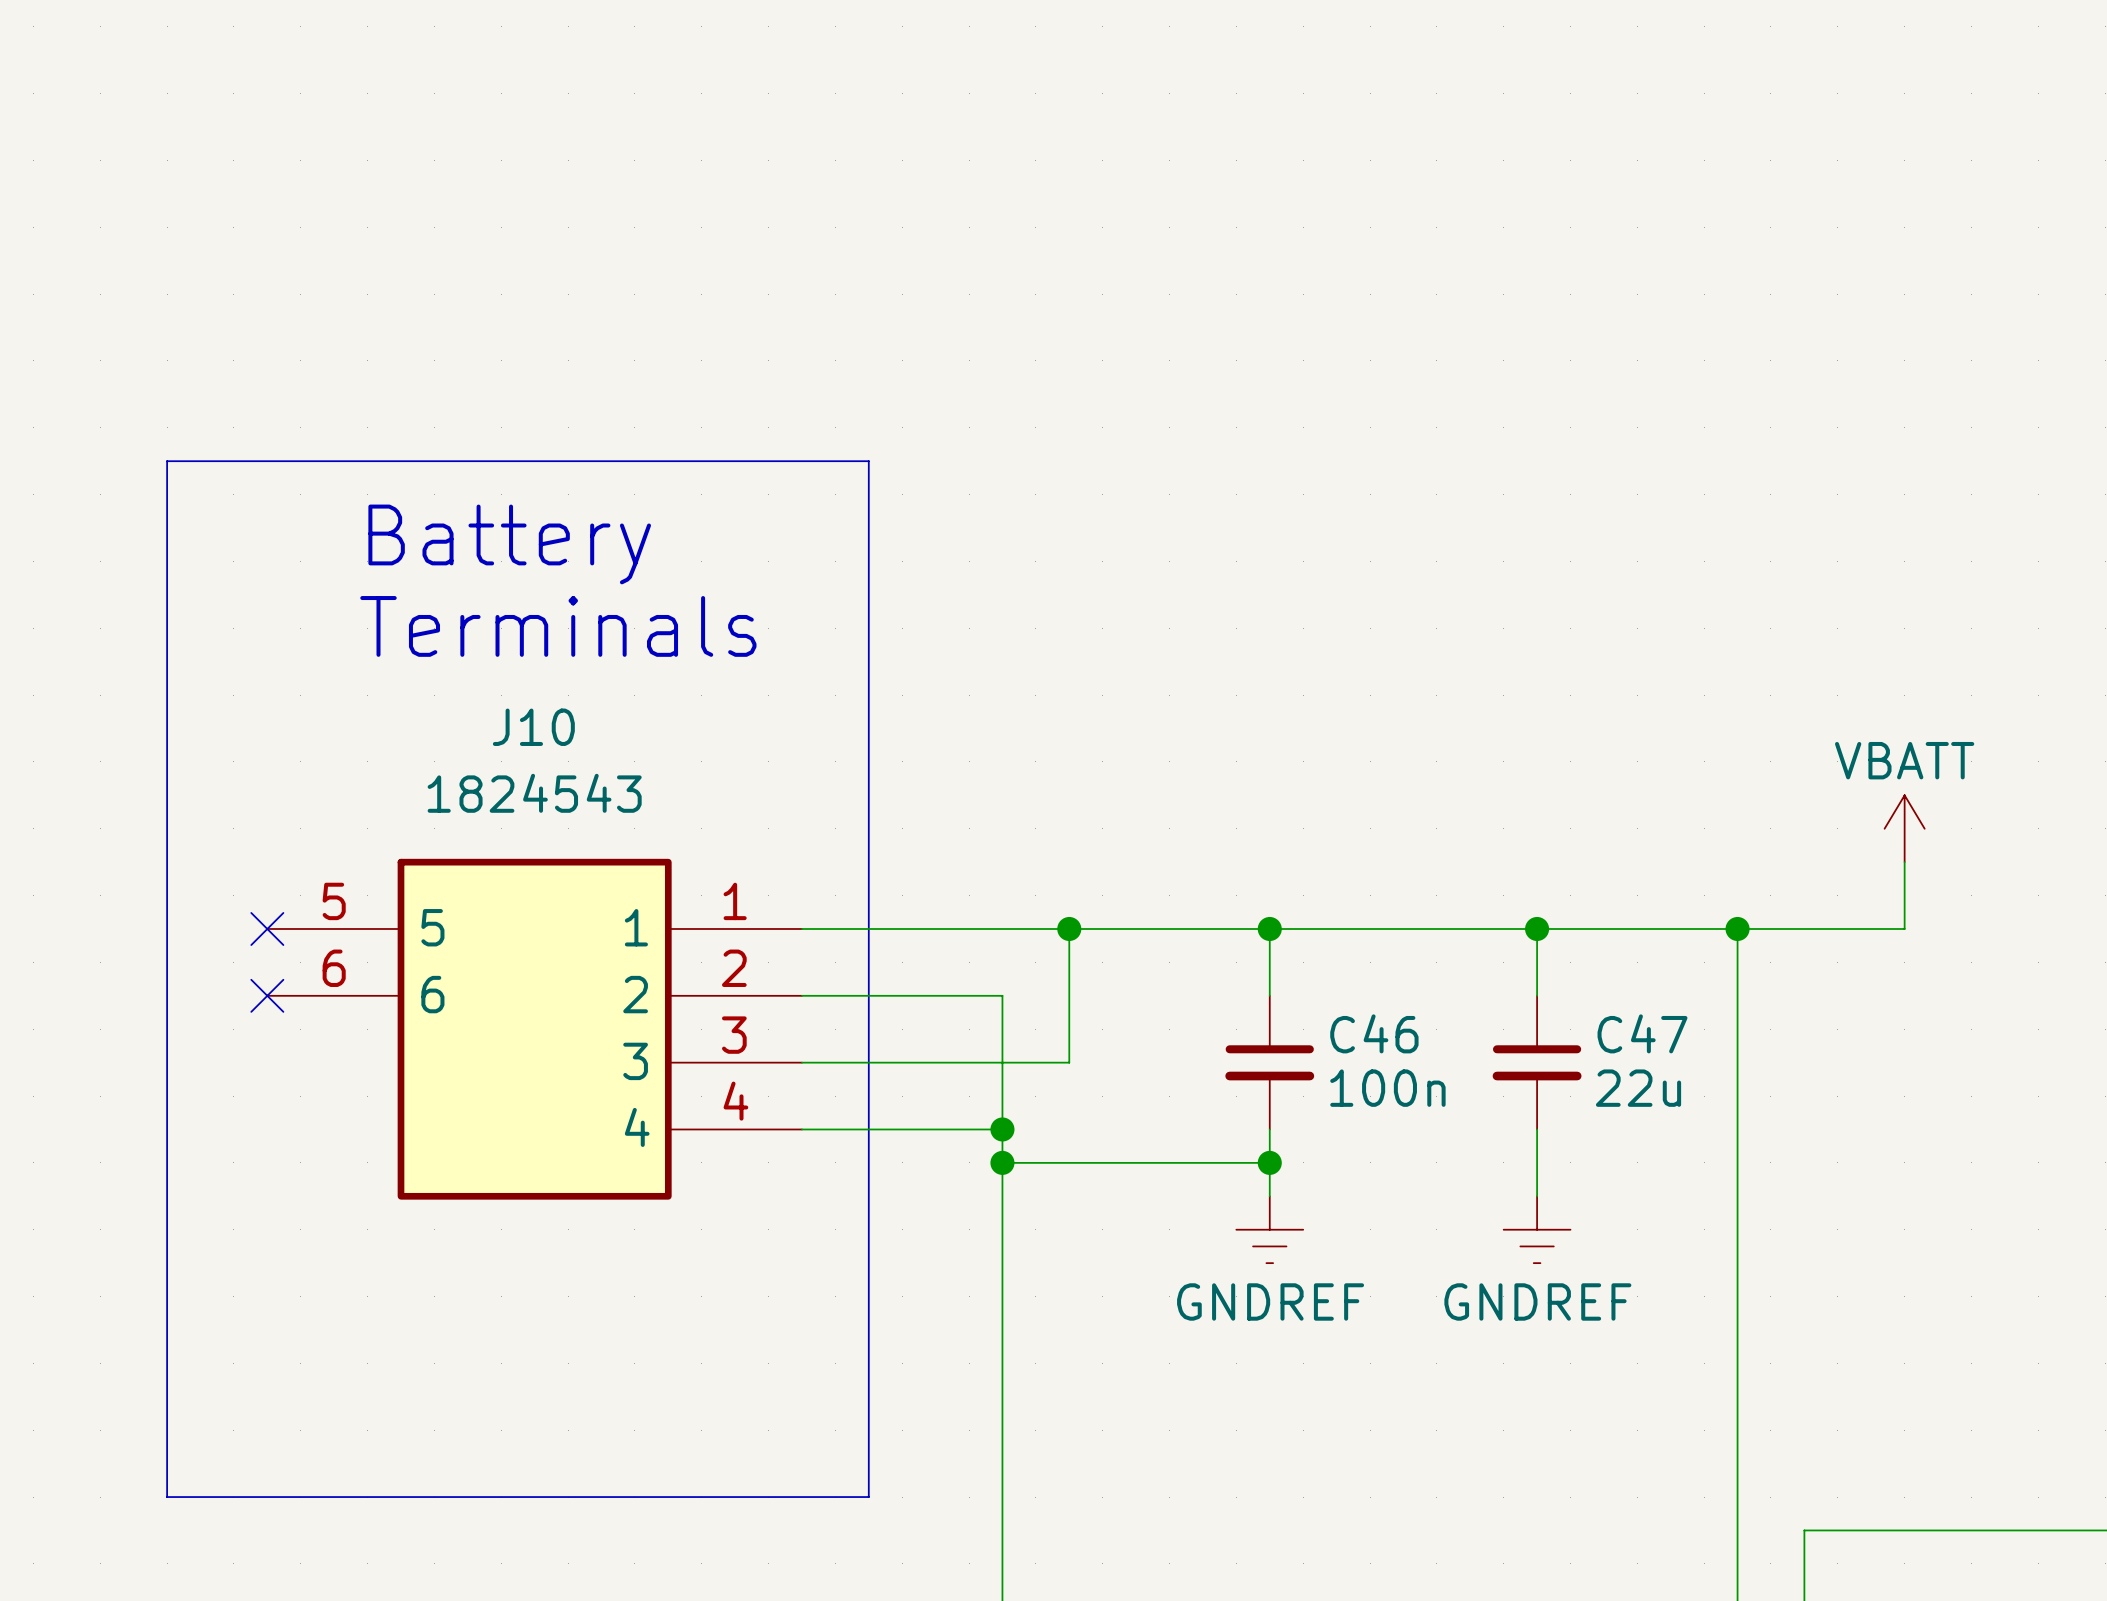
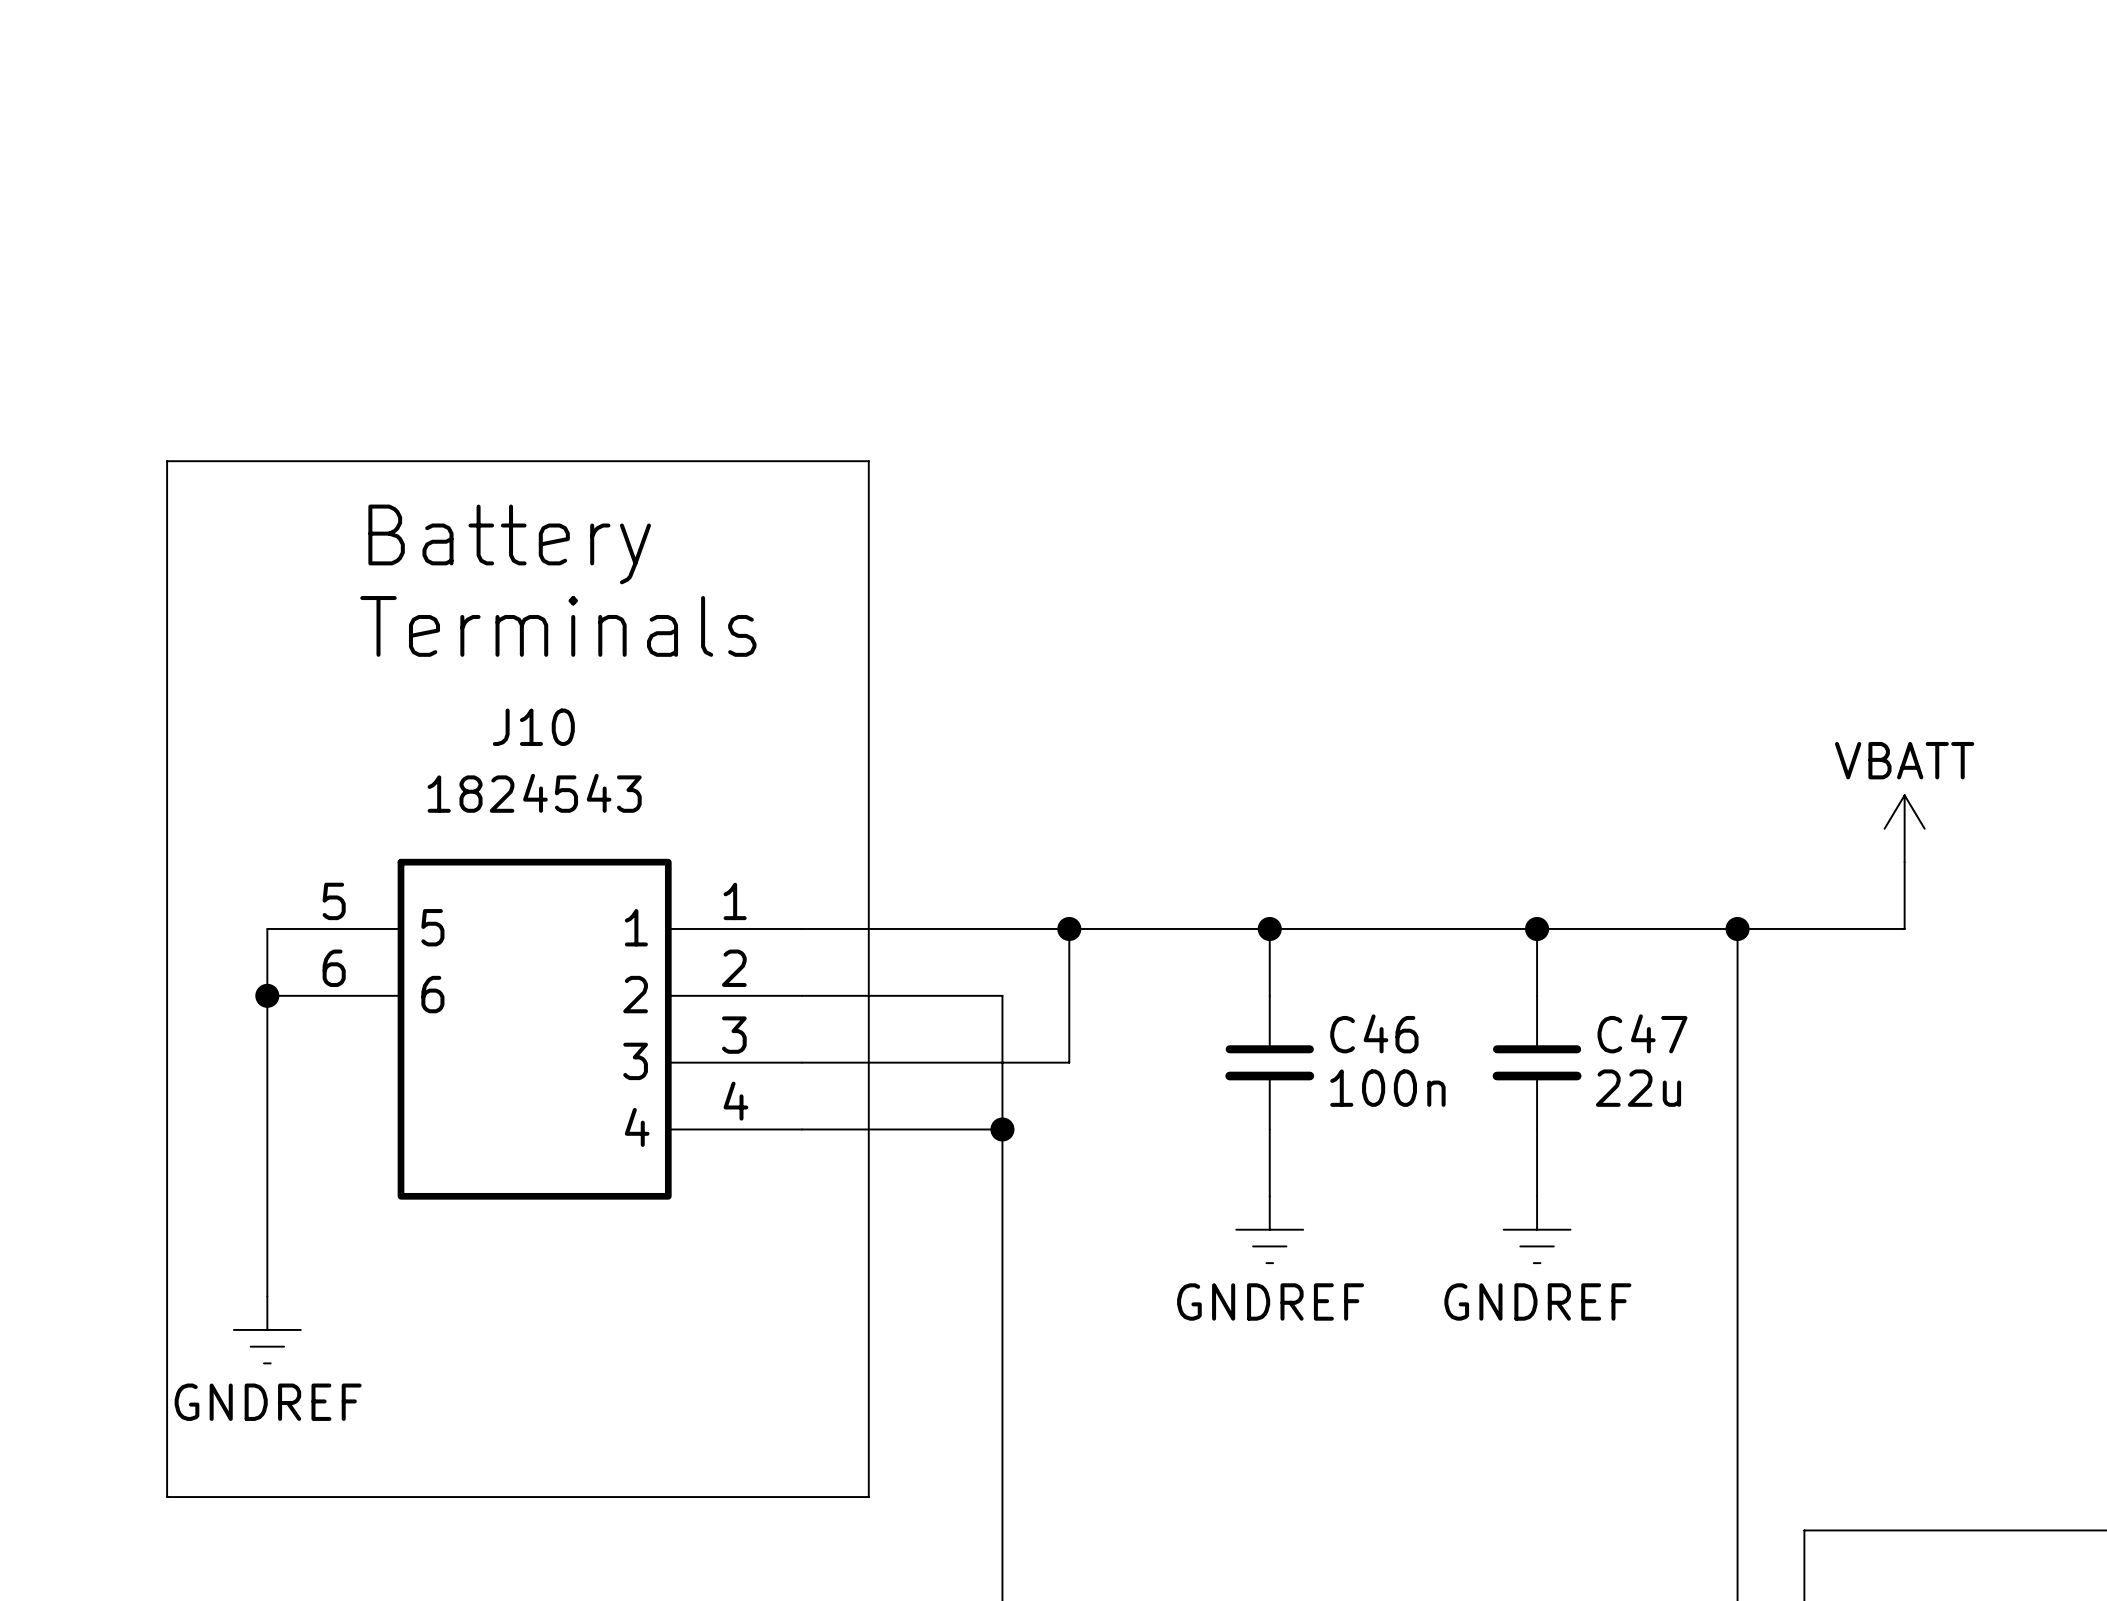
wire: none -> (267, 928) (267, 1296)
no-connect mark: (267, 928) -> none
junction: none -> (267, 995)
no-connect mark: (267, 995) -> none
wire: (1002, 1162) (1269, 1162) -> none
junction: (1002, 1162) -> none
junction: (1269, 1162) -> none
power symbol: none -> GNDREF (267, 1329)

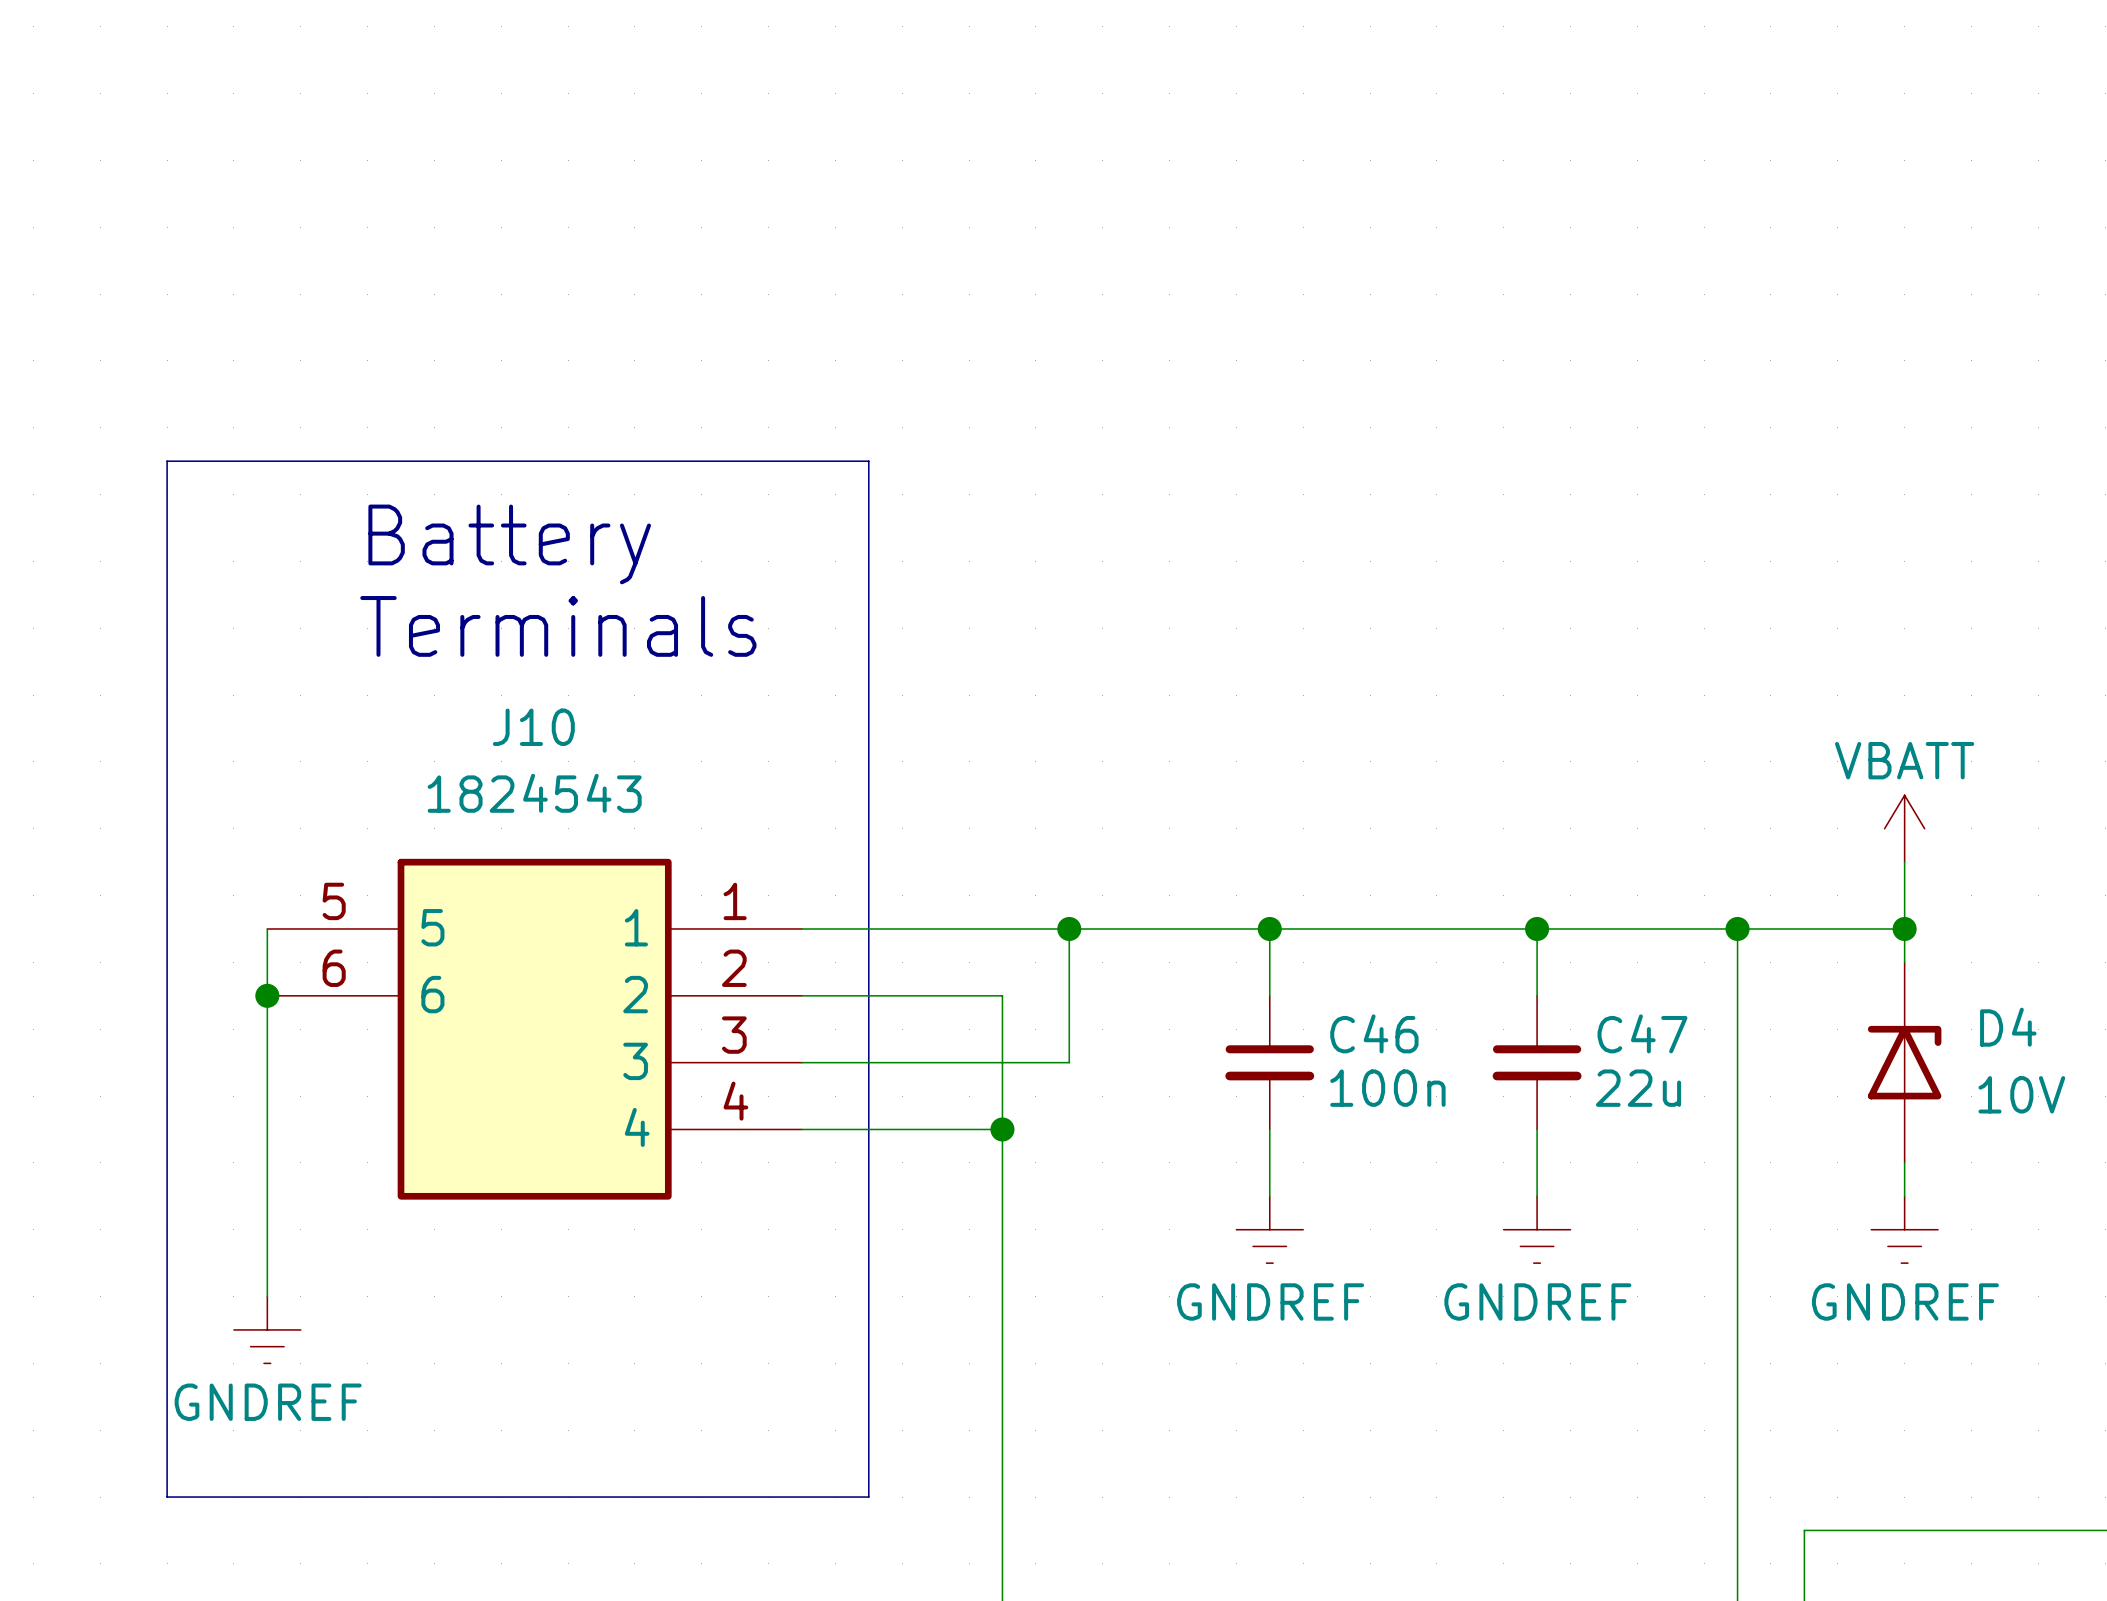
wire: none -> (1904, 928) (1904, 962)
junction: none -> (1904, 928)
D4: none -> 10V (1904, 1062)
wire: none -> (1904, 1162) (1904, 1196)
power symbol: none -> GNDREF (1904, 1229)

